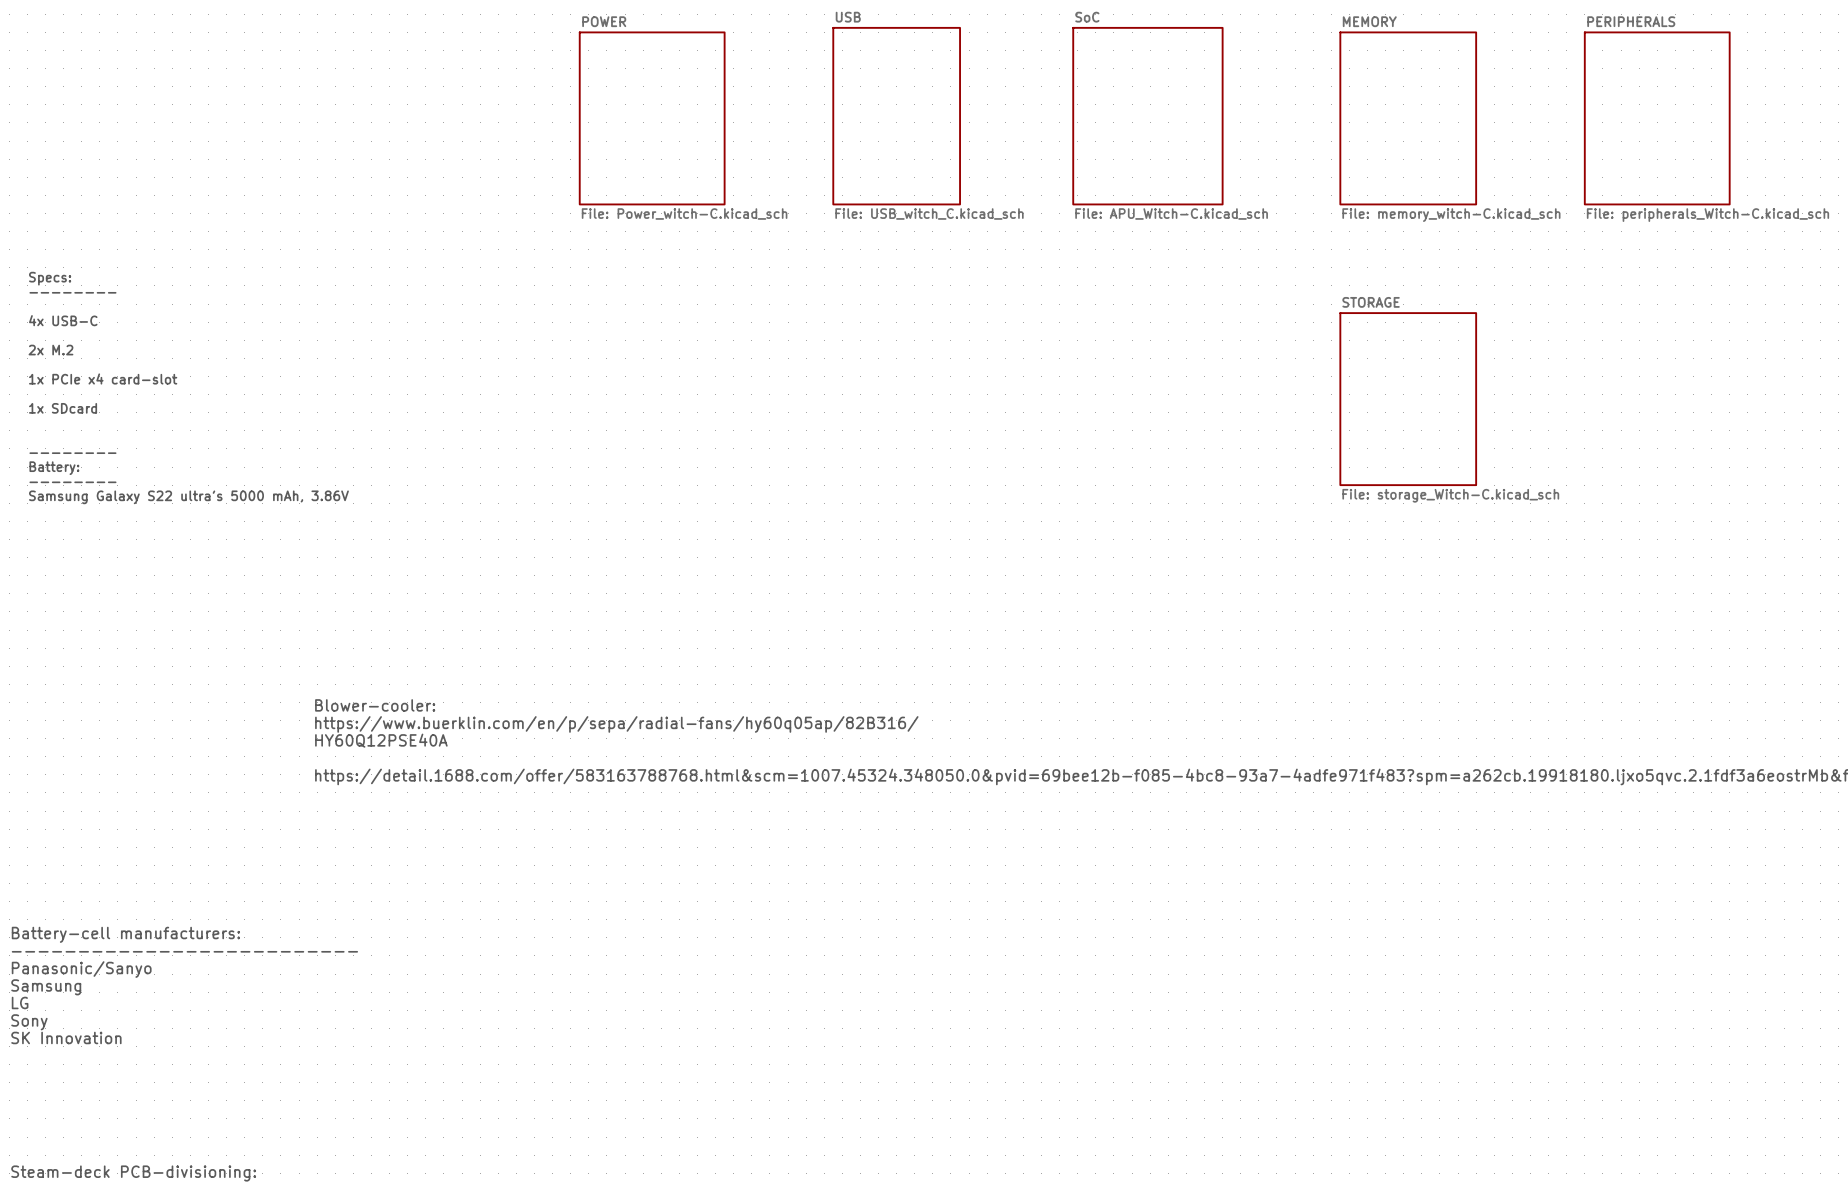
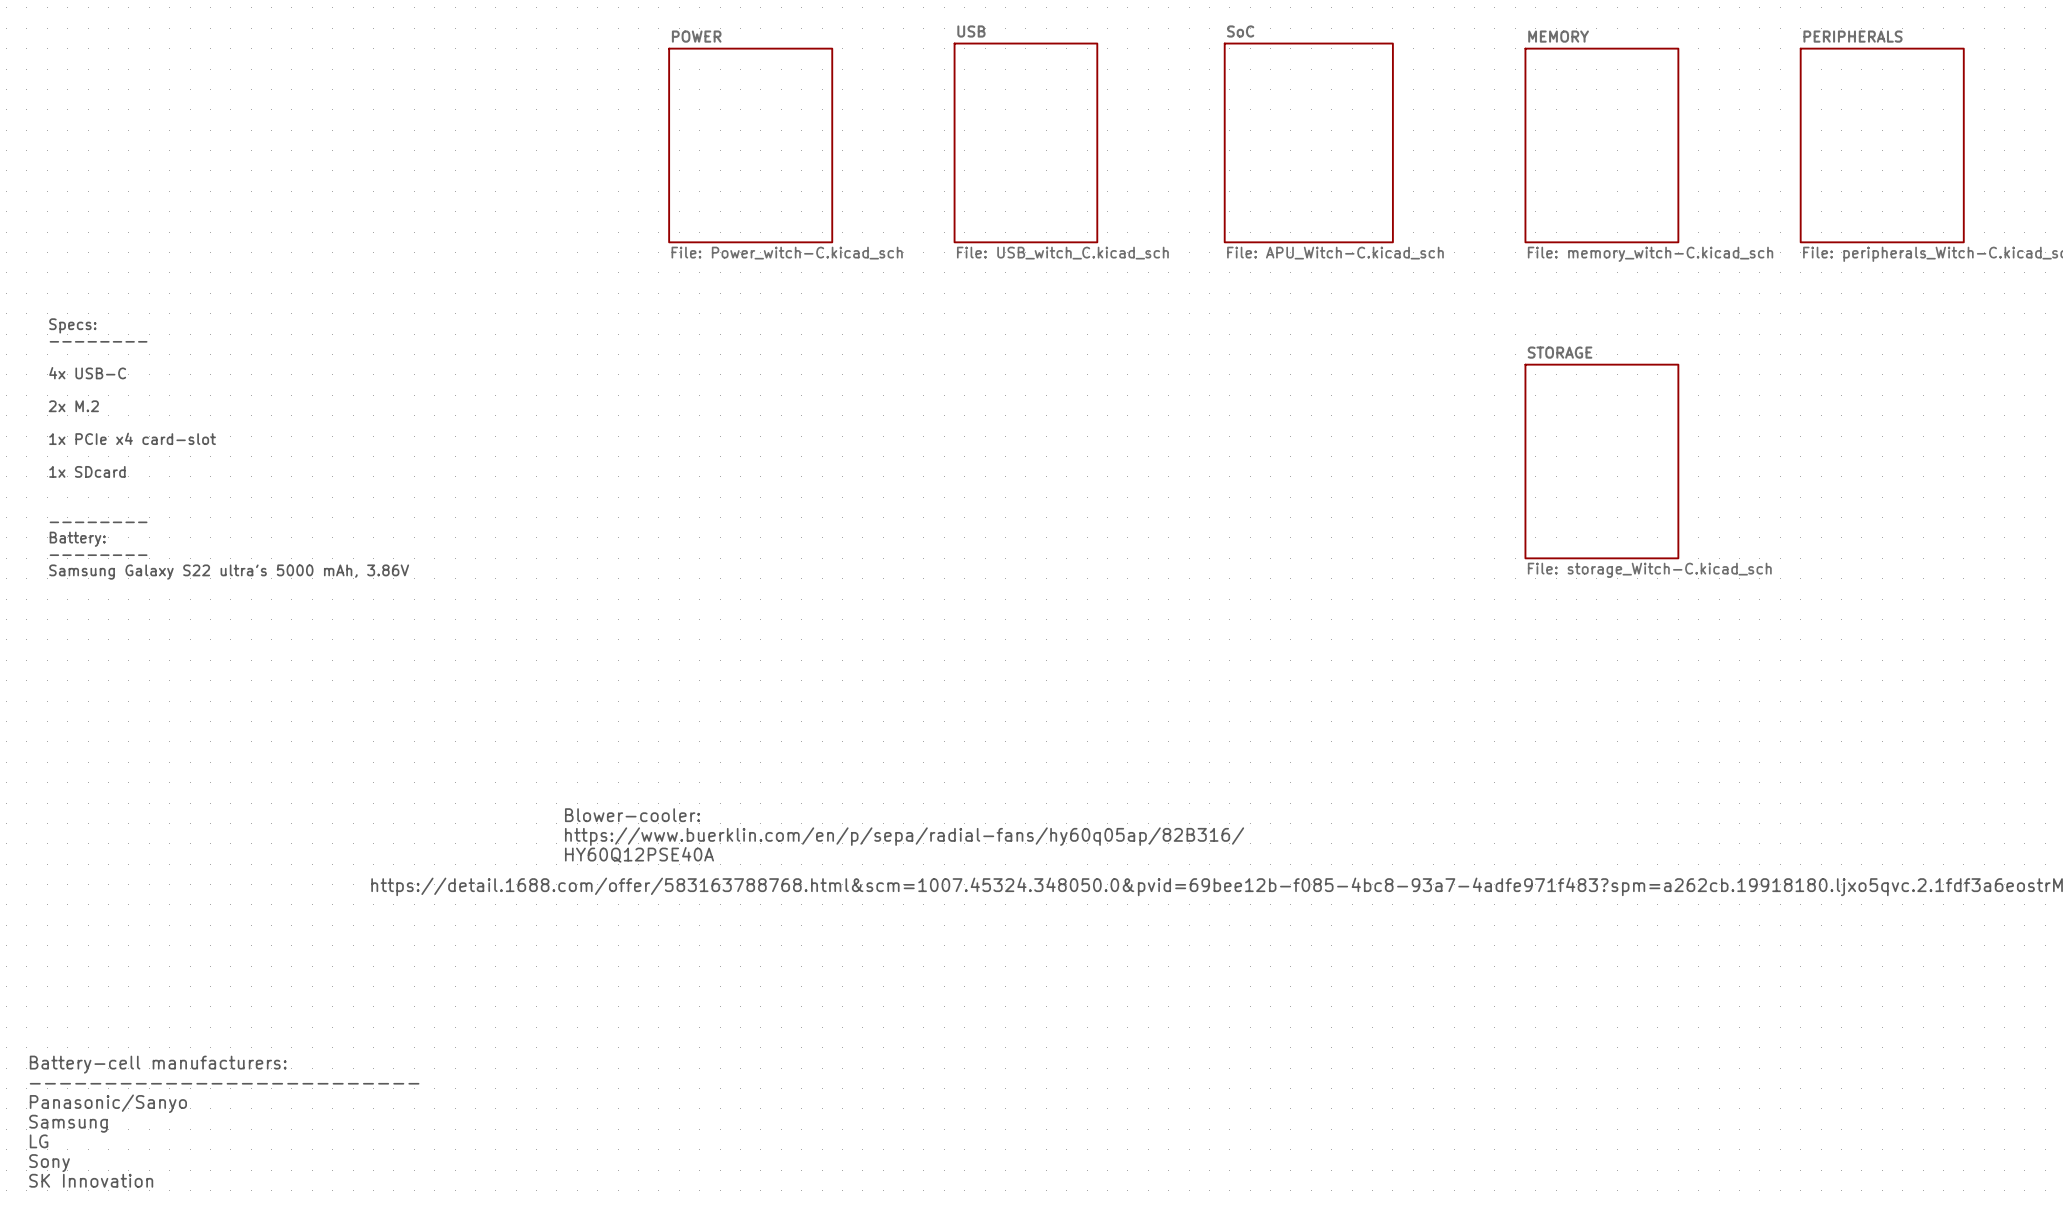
text position: Blower-cooler: (375, 705) -> Blower-cooler: (632, 815)
text position: https://www.buerklin.com/en/p/sepa/radial-fans/hy60q05ap/82B316/ (616, 724) -> https://www.buerklin.com/en/p/sepa/radial-fans/hy60q05ap/82B316/ (904, 836)
text position: HY60Q12PSE40A (381, 740) -> HY60Q12PSE40A (639, 854)

